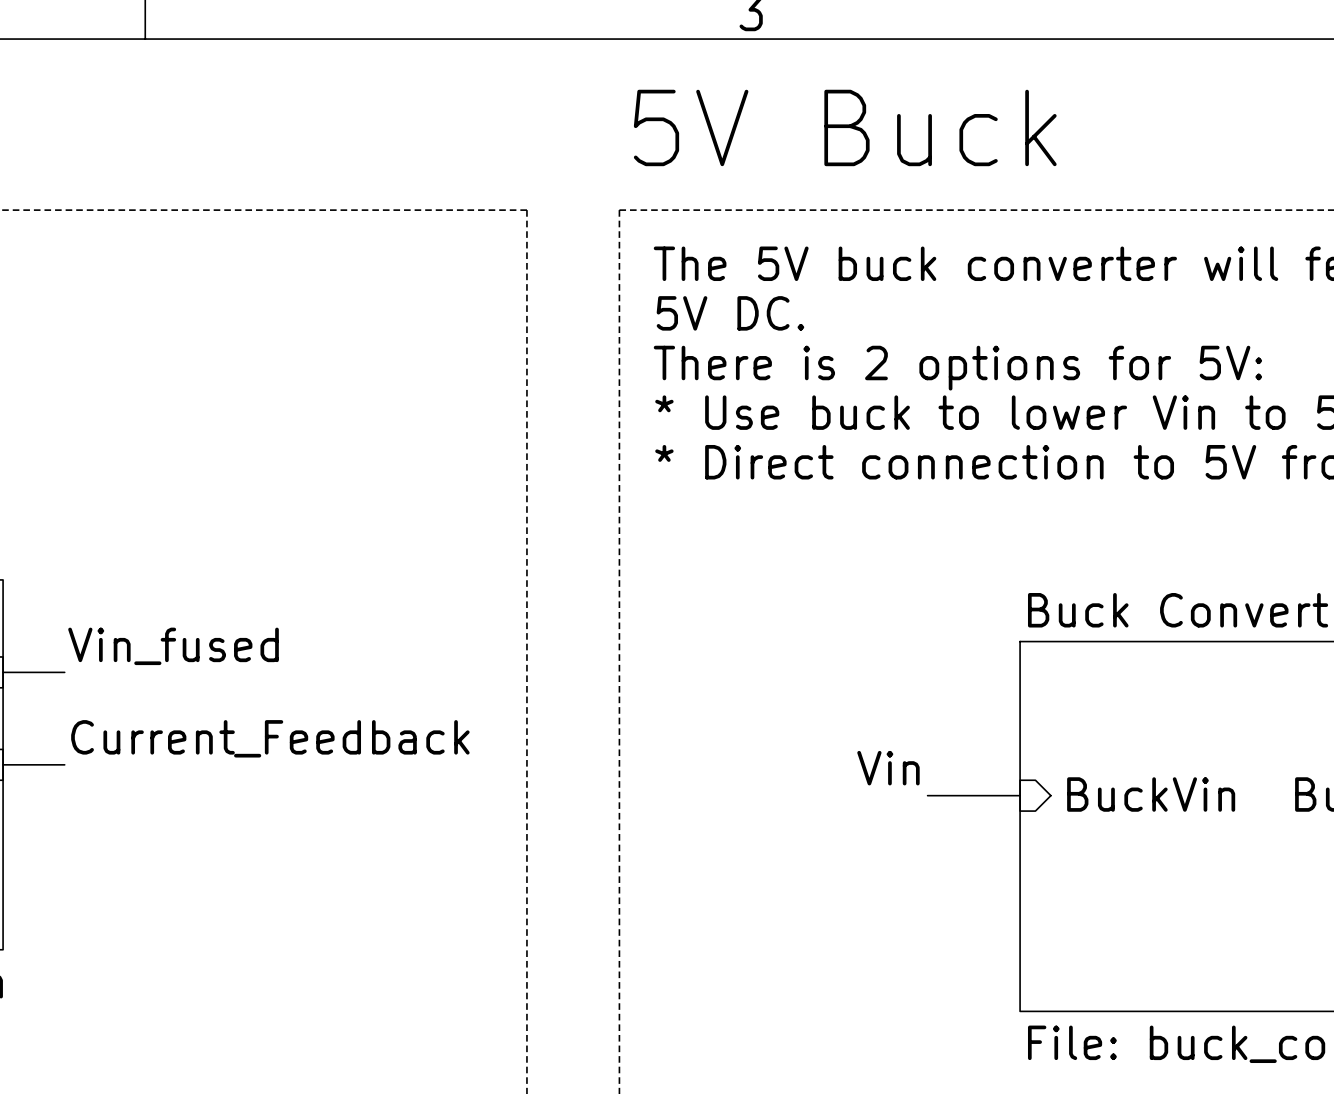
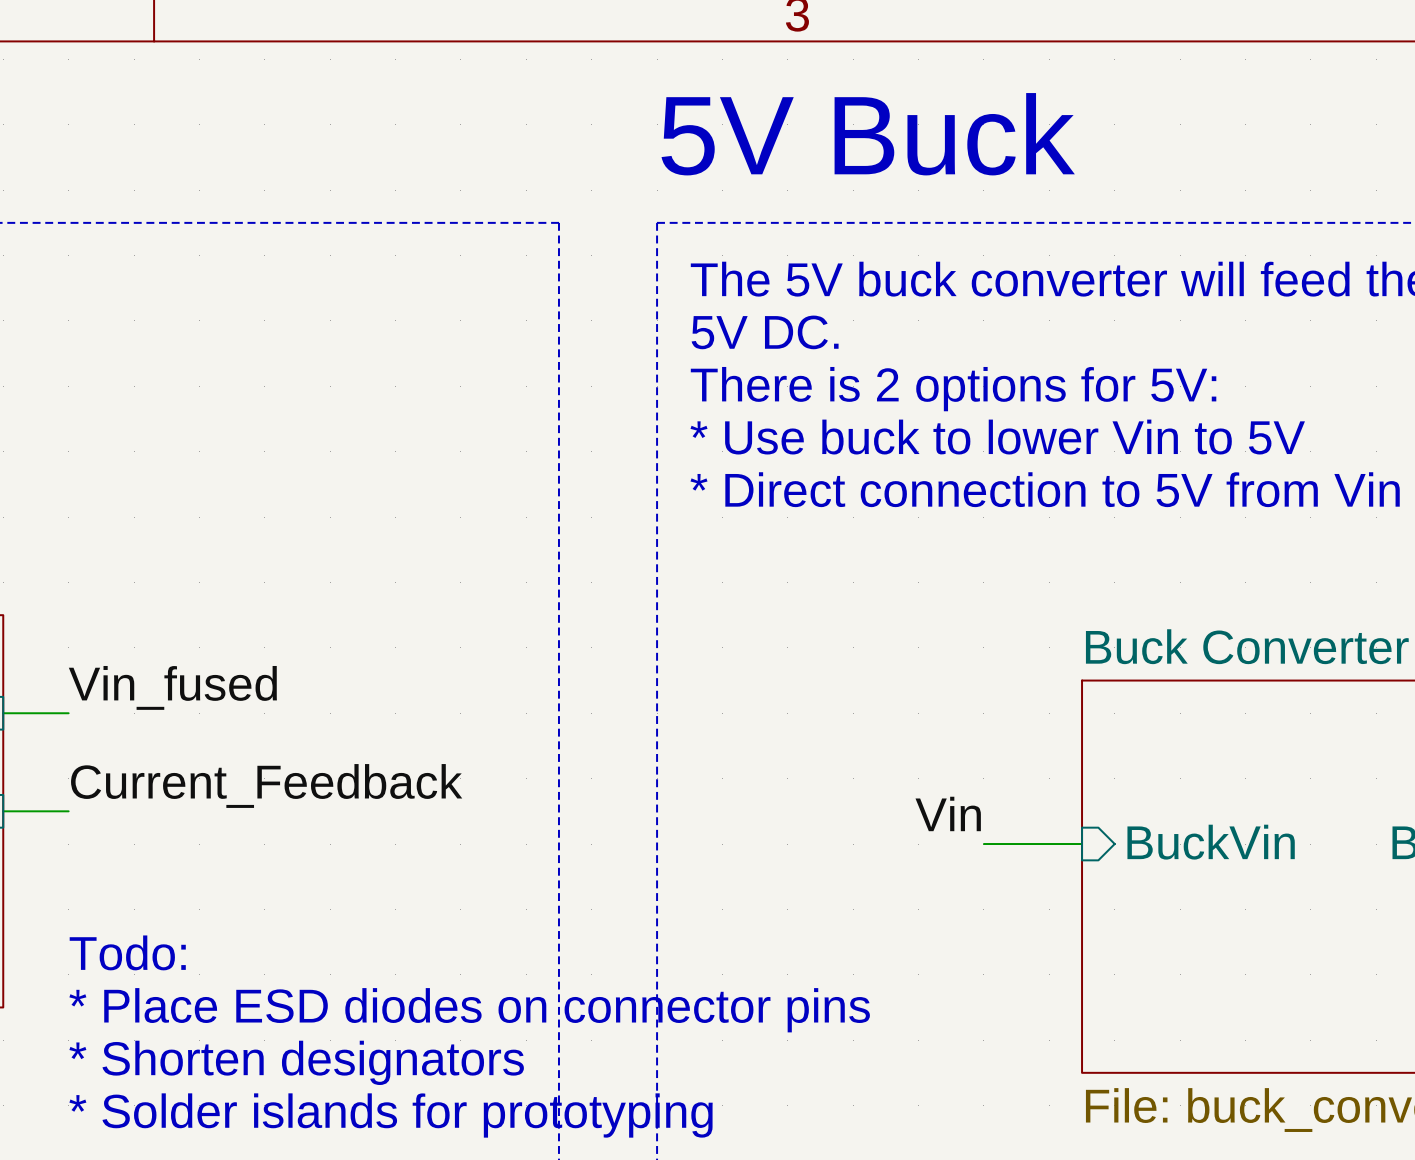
text: none -> Todo: (127, 952)
text: none -> * Place ESD diodes on connector pins (469, 1010)
text: none -> * Shorten designators (296, 1062)
text: none -> * Solder islands for prototyping (391, 1115)

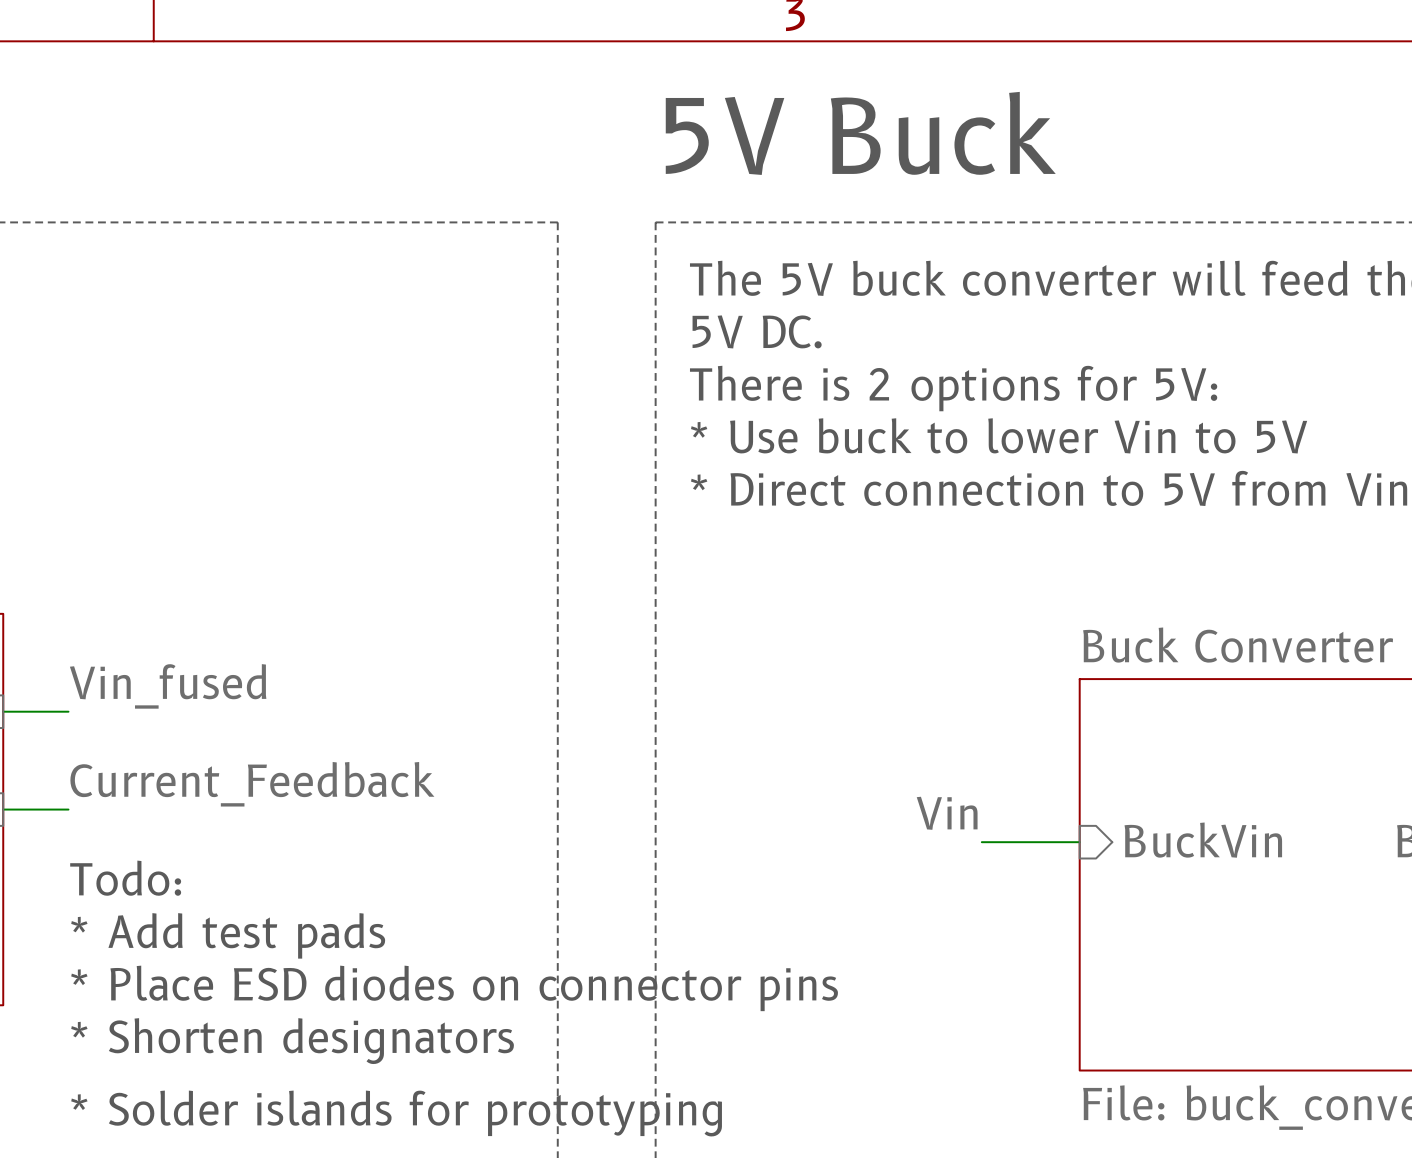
text: none -> * Add test pads (228, 935)
text position: Todo: (127, 952) -> Todo: (125, 878)
text position: * Place ESD diodes on connector pins (469, 1010) -> * Place ESD diodes on connector pins (454, 988)
text position: * Shorten designators (296, 1062) -> * Shorten designators (292, 1041)

